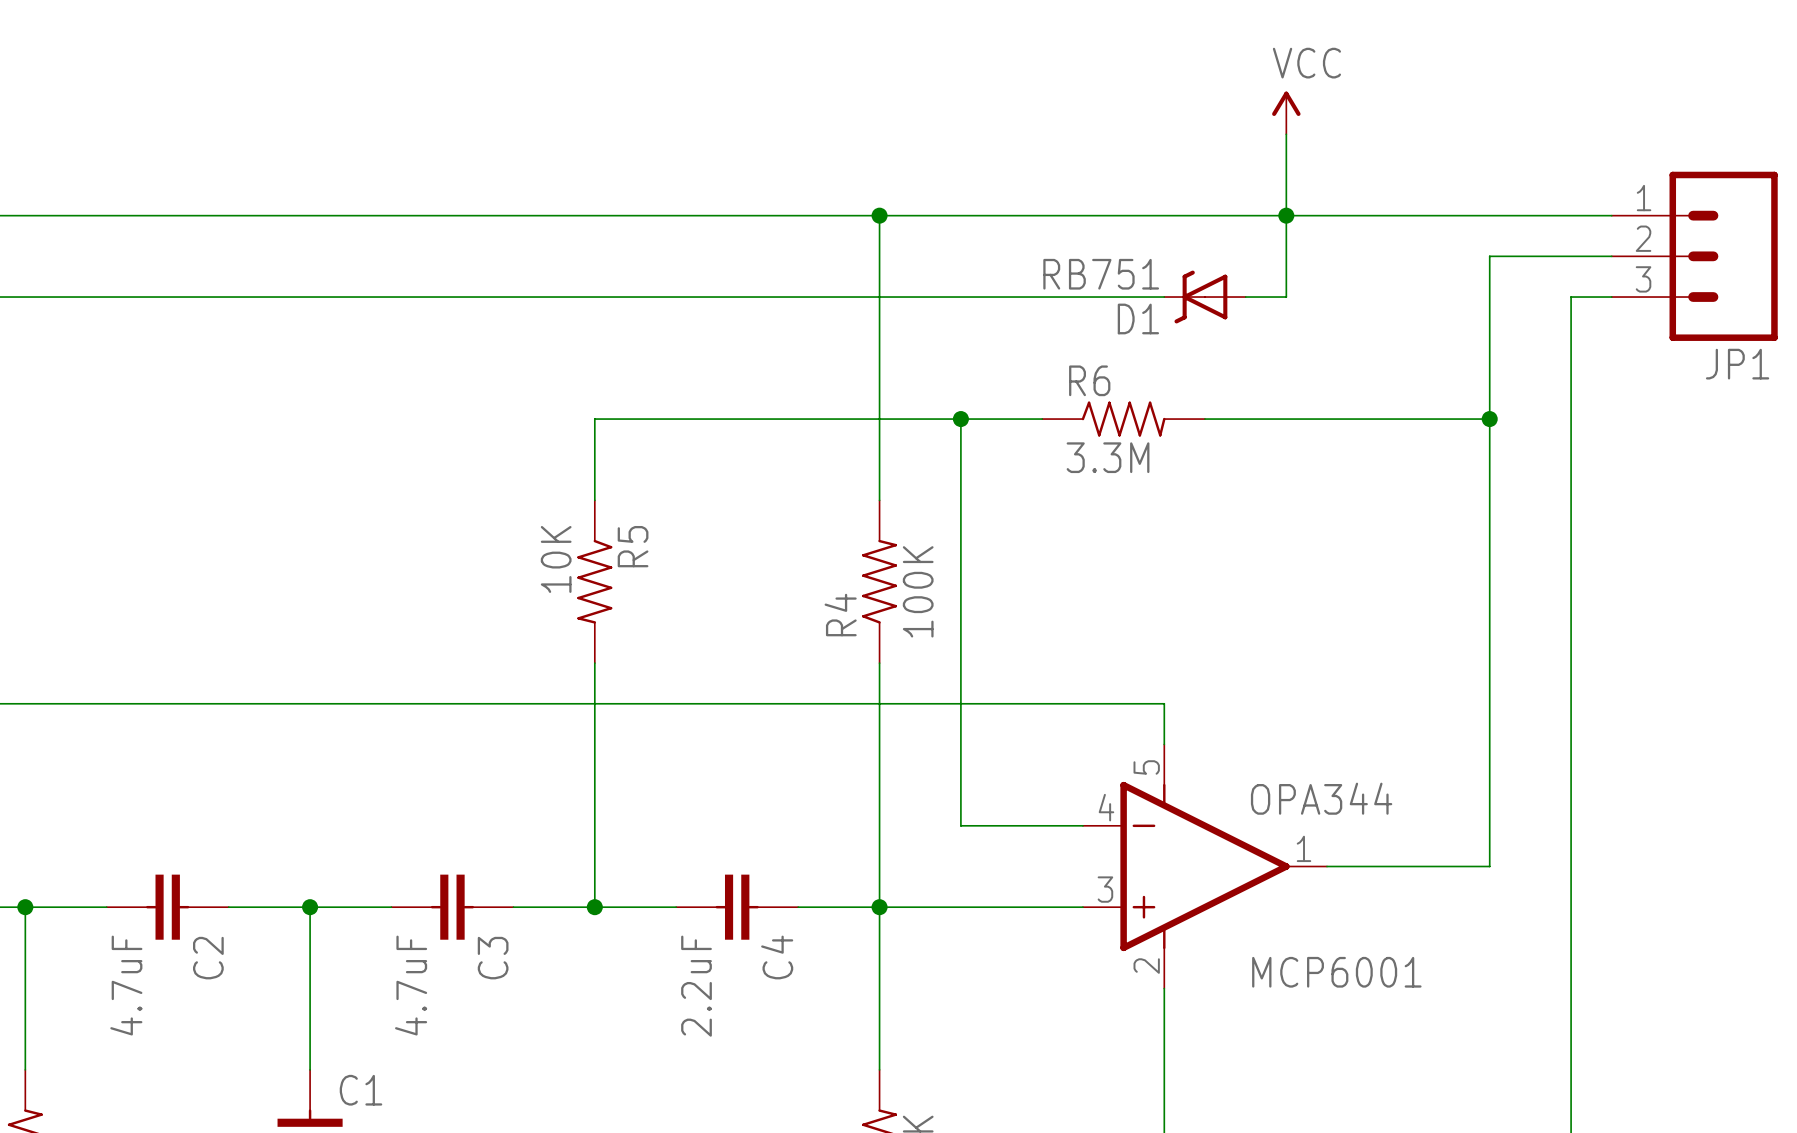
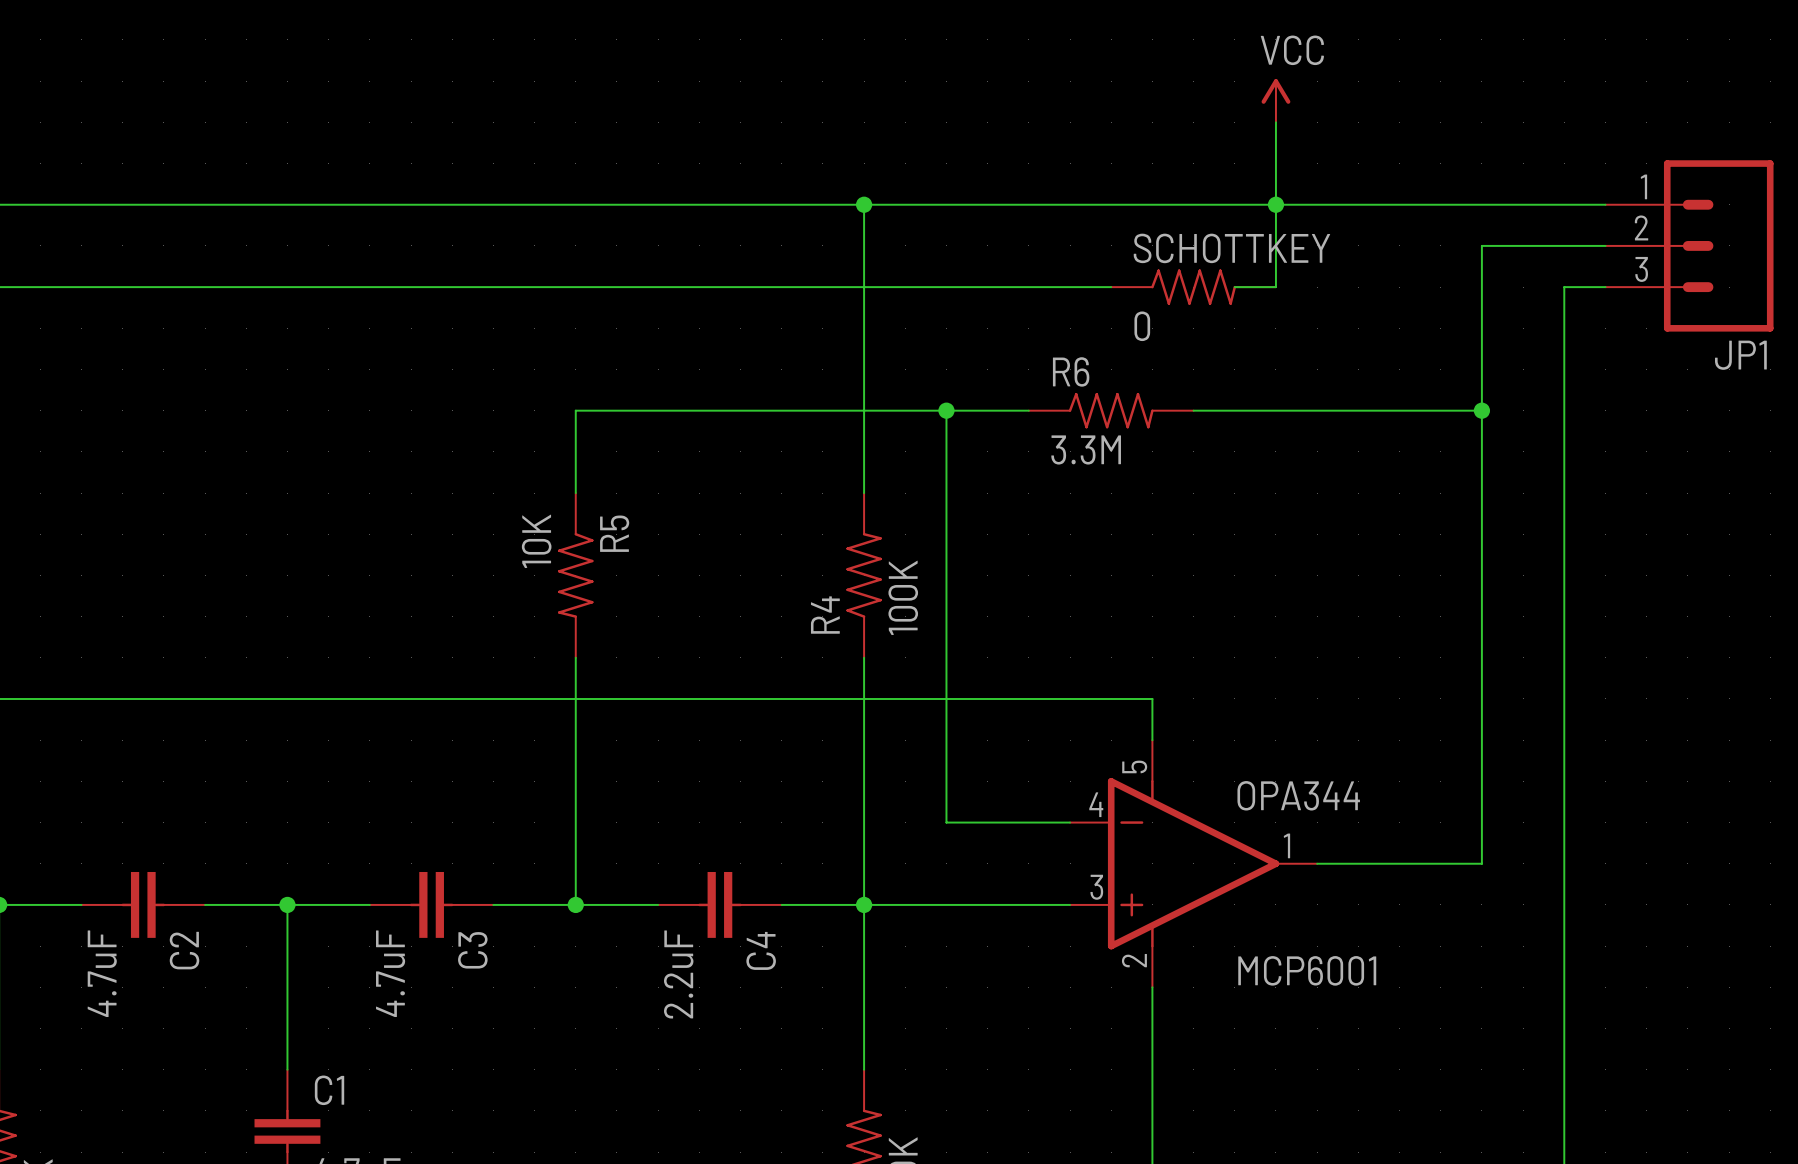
D1: RB751 (1204, 297) -> none
SCHOTTKEY: none -> 0 (1193, 287)

